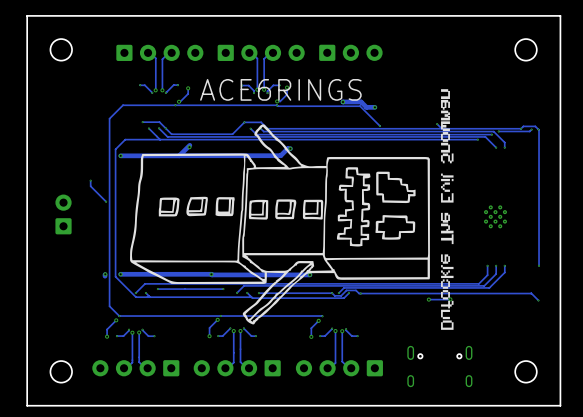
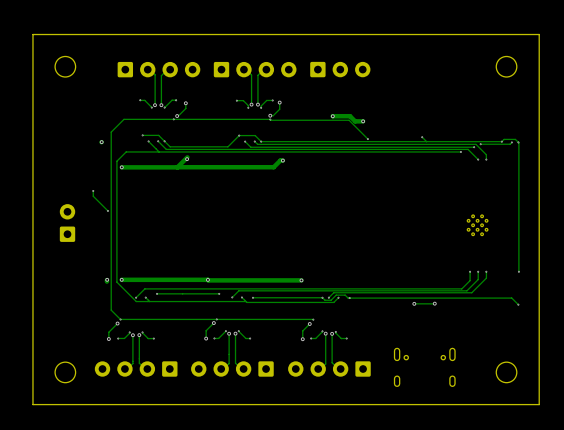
text: ACE6RINGS (280, 89) -> none
drawing: [441, 89, 454, 164] -> none
drawing: [130, 124, 430, 325] -> none
track: none -> (101, 142) (101, 142)
via: none -> (101, 142)
drawing: [441, 173, 454, 203] -> none
drawing: [441, 212, 454, 245] -> none
drawing: [441, 254, 454, 330] -> none

